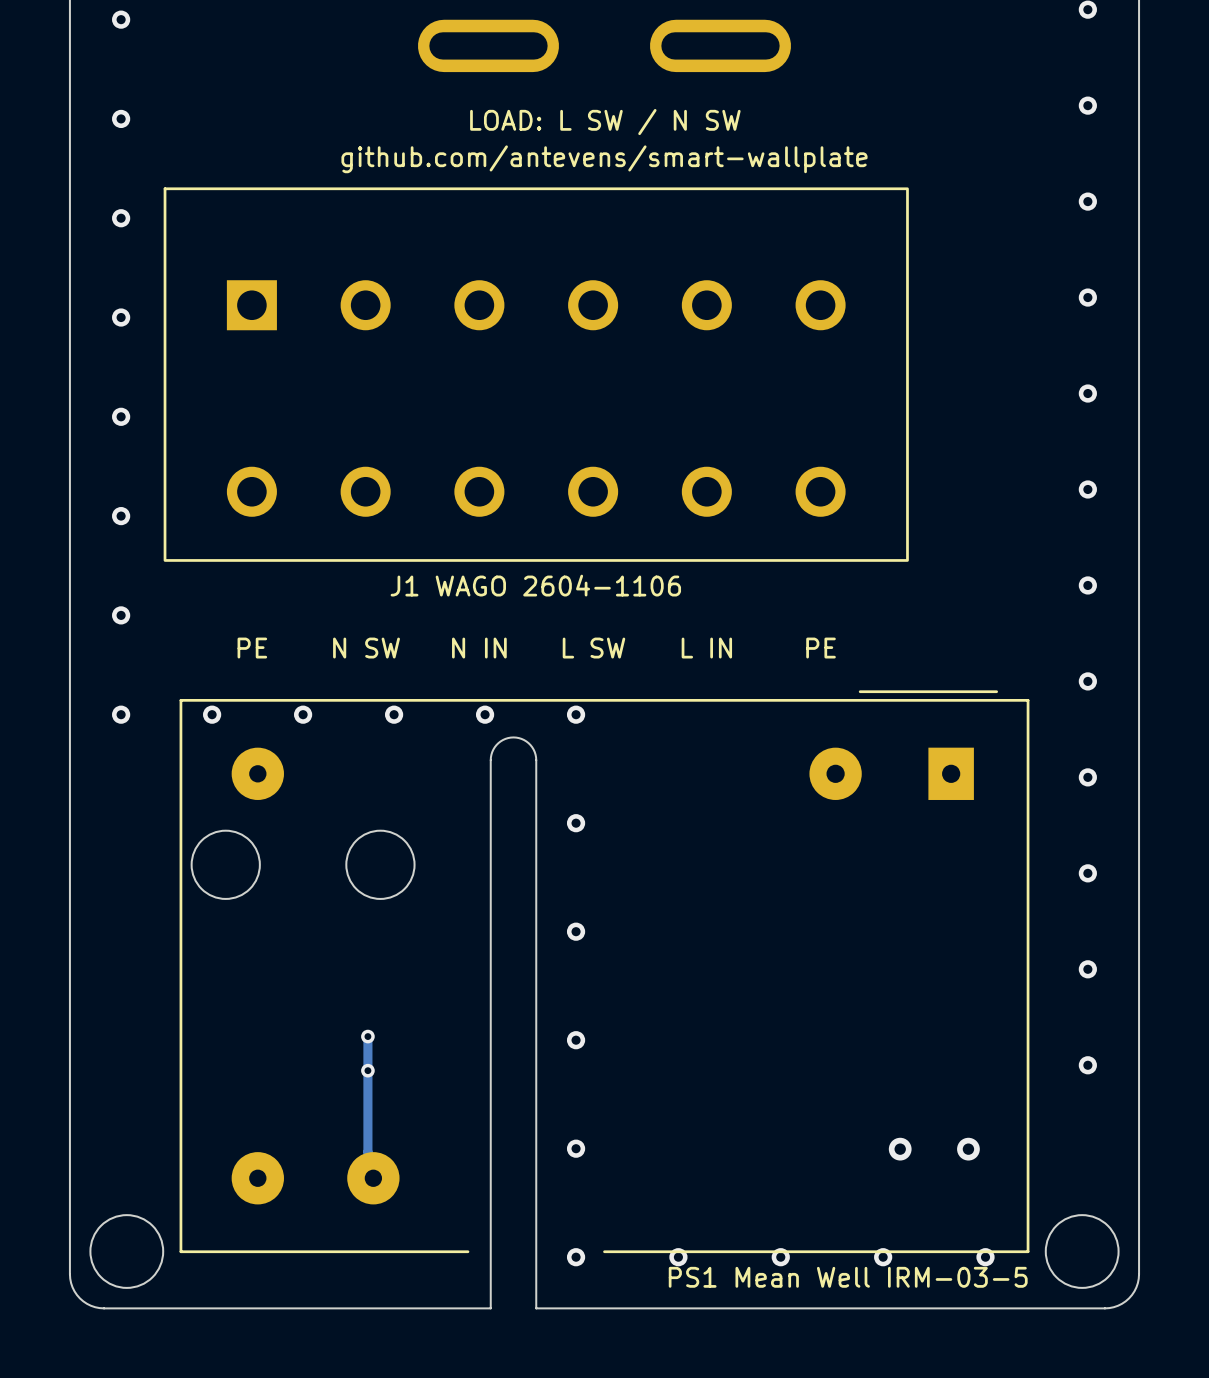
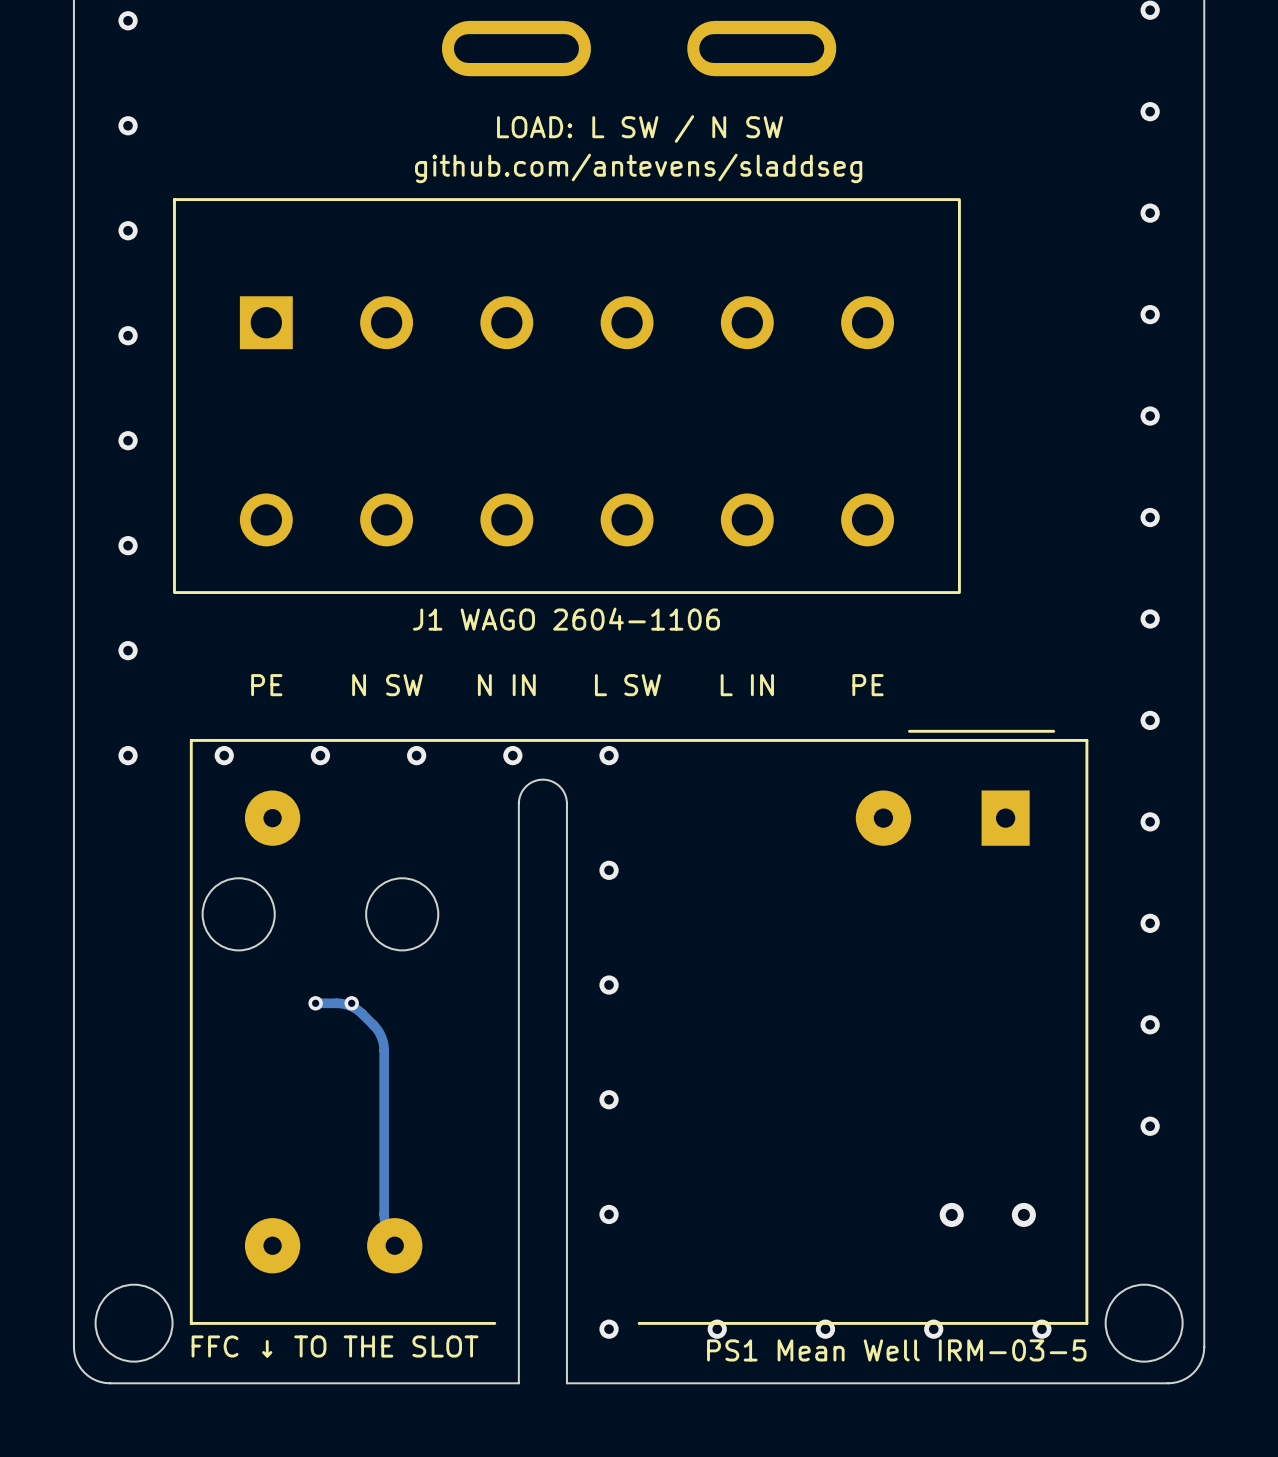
text: github.com/antevens/smart-wallplate (604, 159) -> github.com/antevens/sladdseg (638, 168)
via: none -> (315, 1003)
via: none -> (351, 1003)
track: (367, 1036) (367, 1151) (373, 1178) -> (315, 1003) (340, 1003) (353, 1007) (375, 1027) (382, 1040) (384, 1218) (394, 1245)
via: (367, 1036) -> none
via: (367, 1070) -> none
text: none -> FFC ↓ TO THE SLOT (335, 1346)

